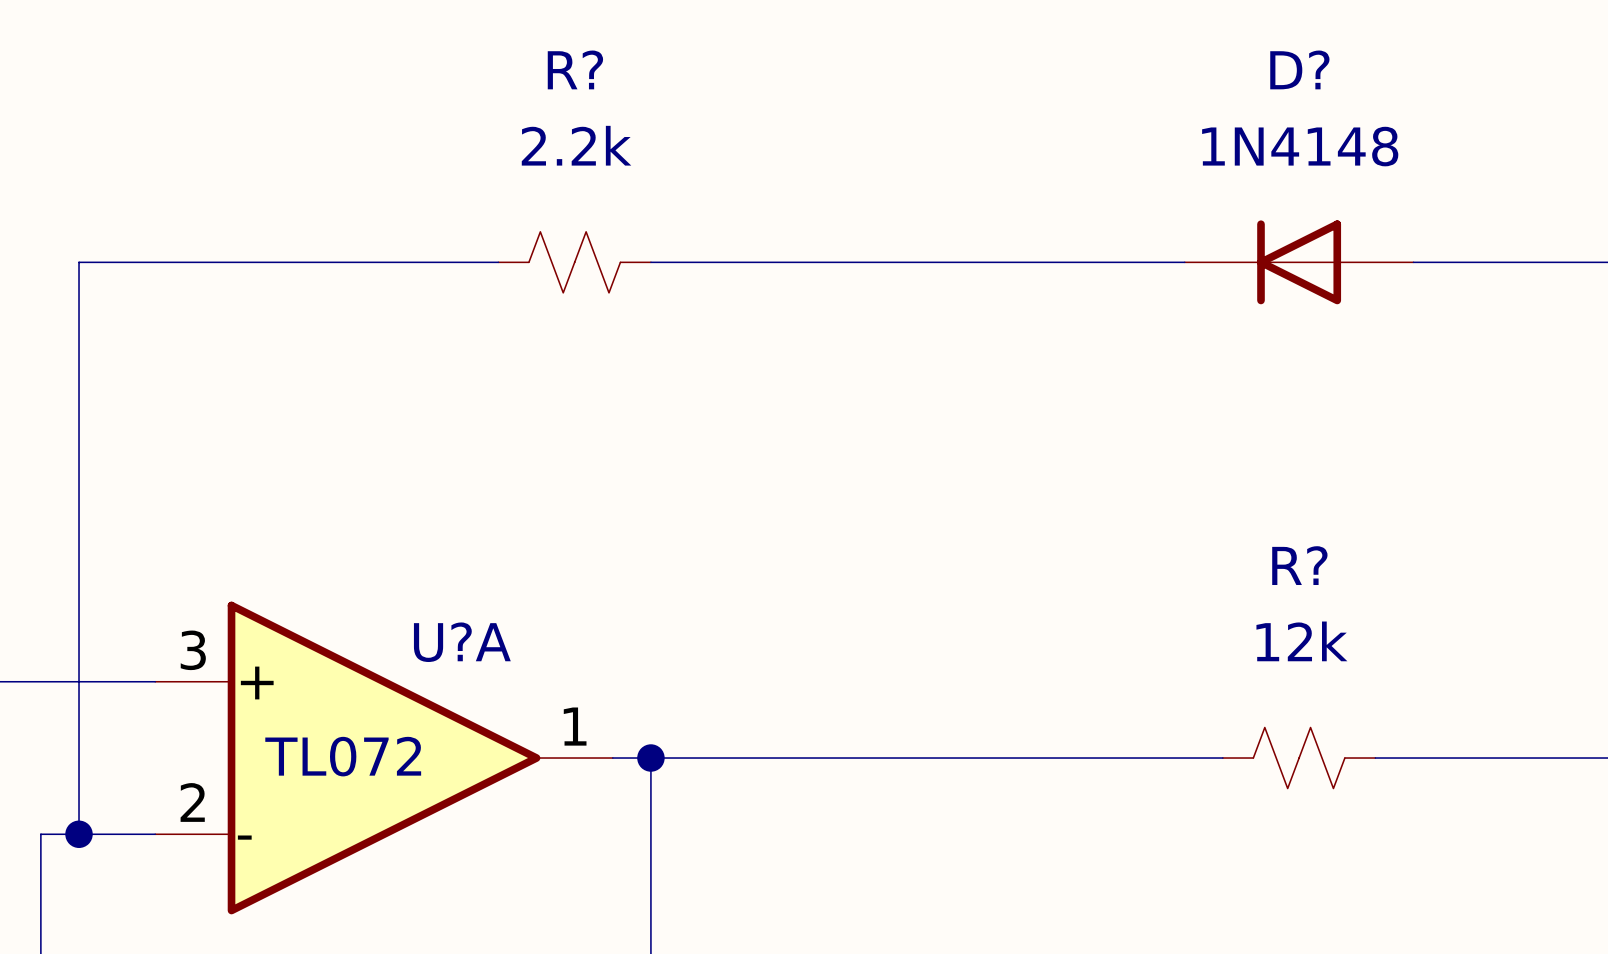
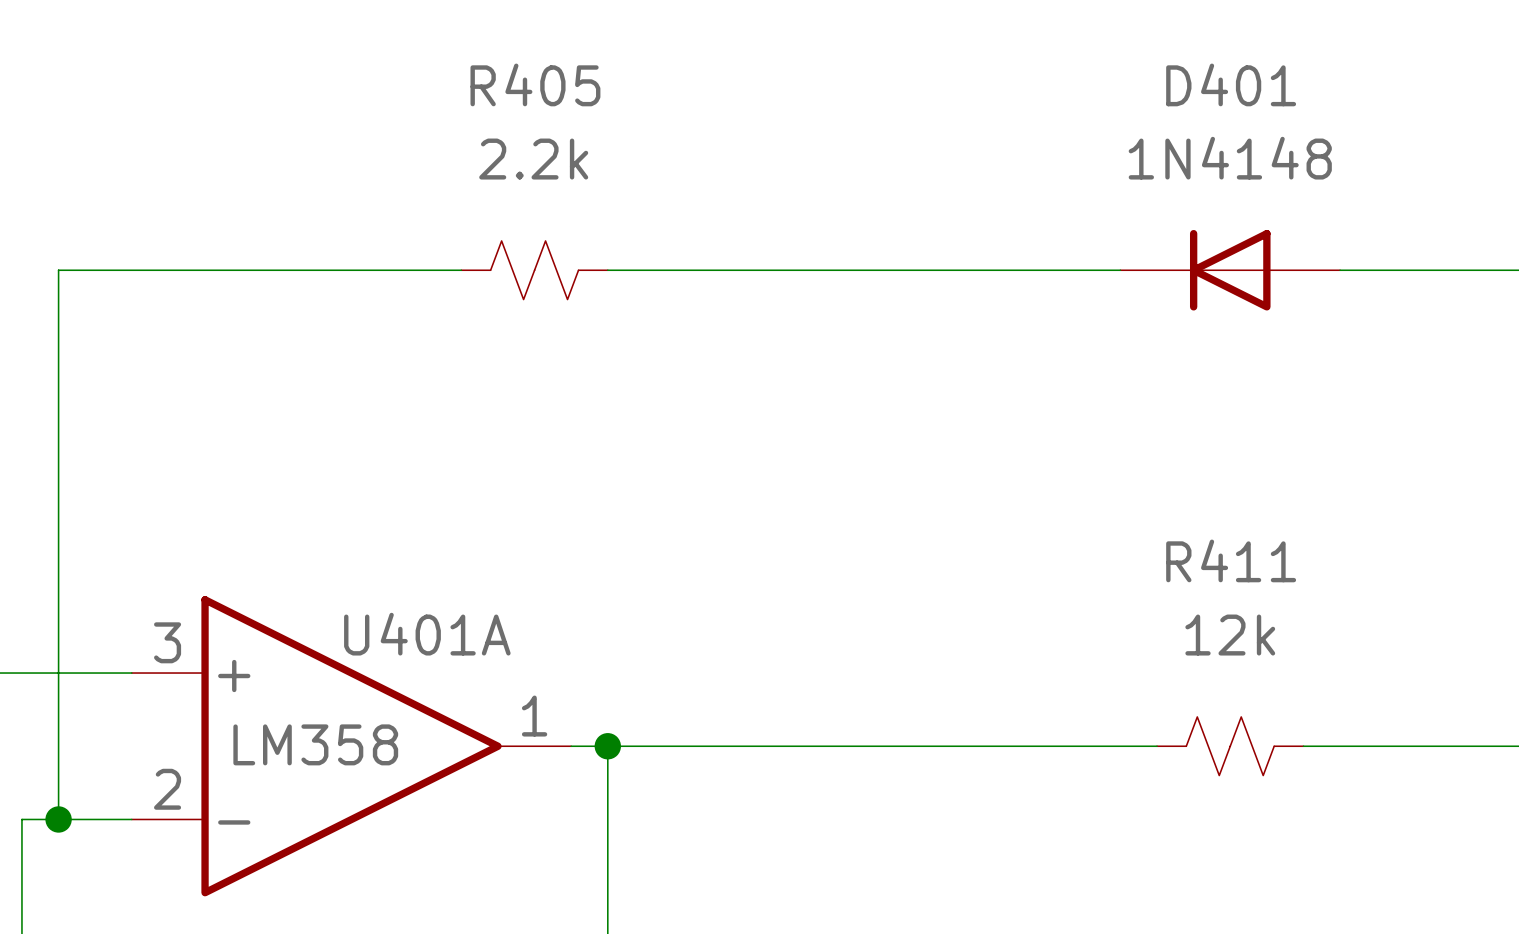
R? name: R? (575, 69) -> R405 (535, 84)
D? name: D? (1299, 69) -> D401 (1231, 84)
R? name: R? (1299, 565) -> R411 (1231, 560)
U?A name: U?A (462, 642) -> U401A (427, 634)
U?A value: TL072 (343, 756) -> LM358 (315, 744)

